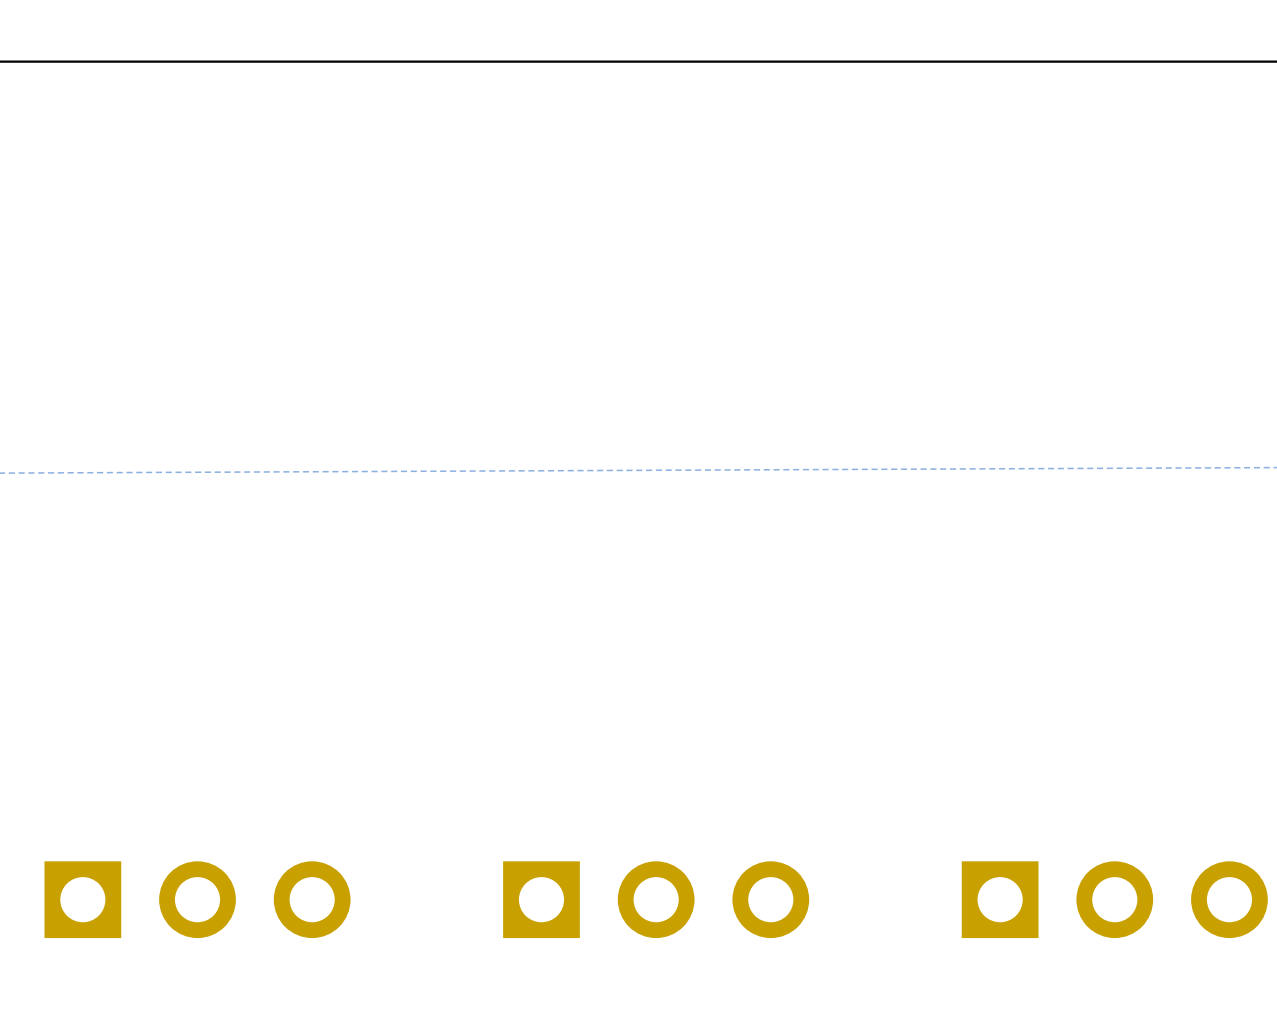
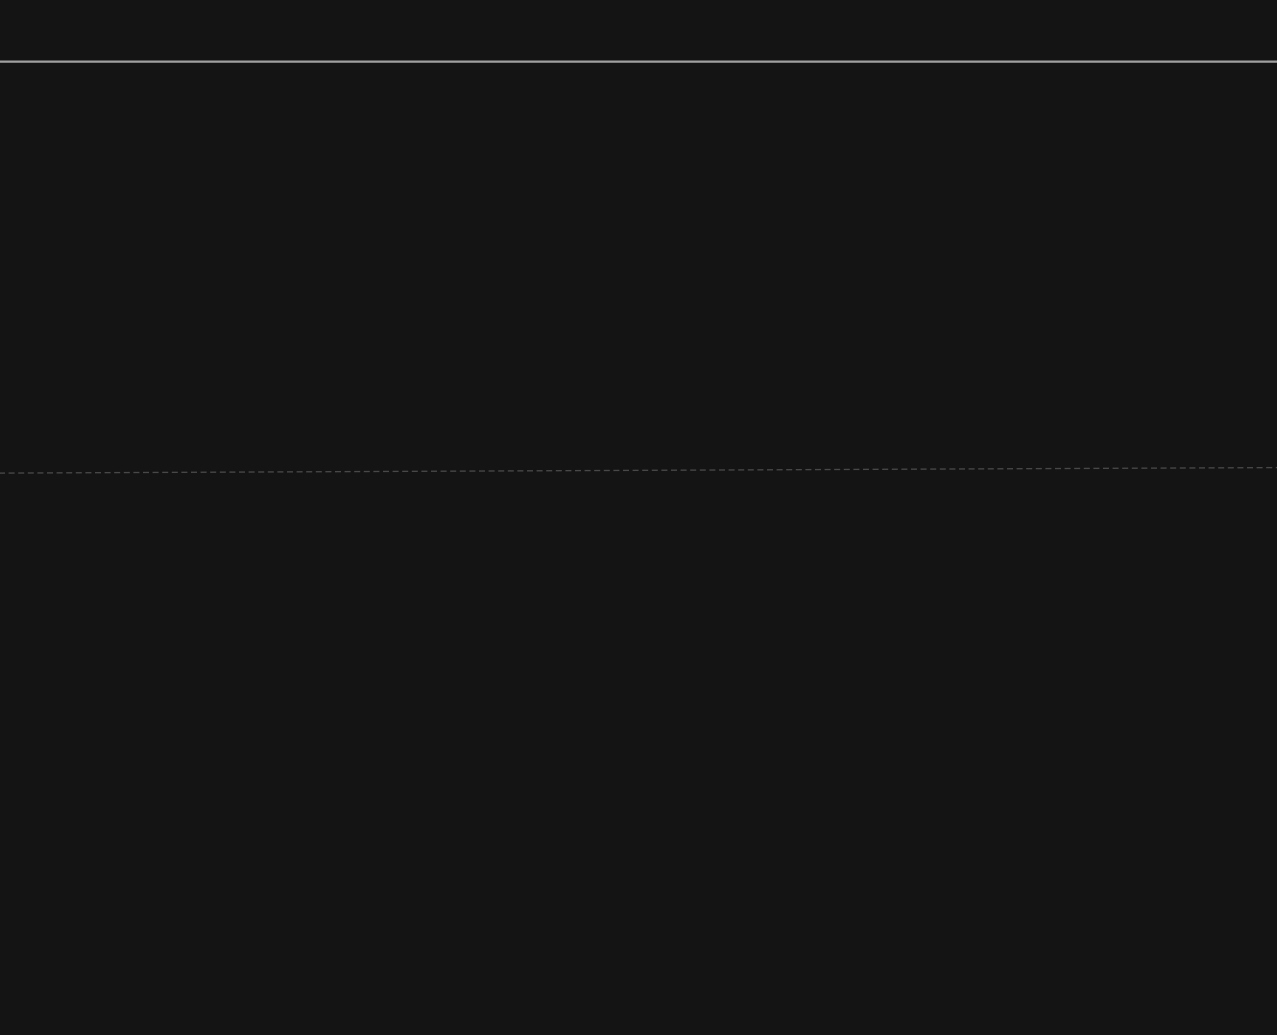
part: (197, 899) -> none
part: (656, 899) -> none
part: (1114, 899) -> none

